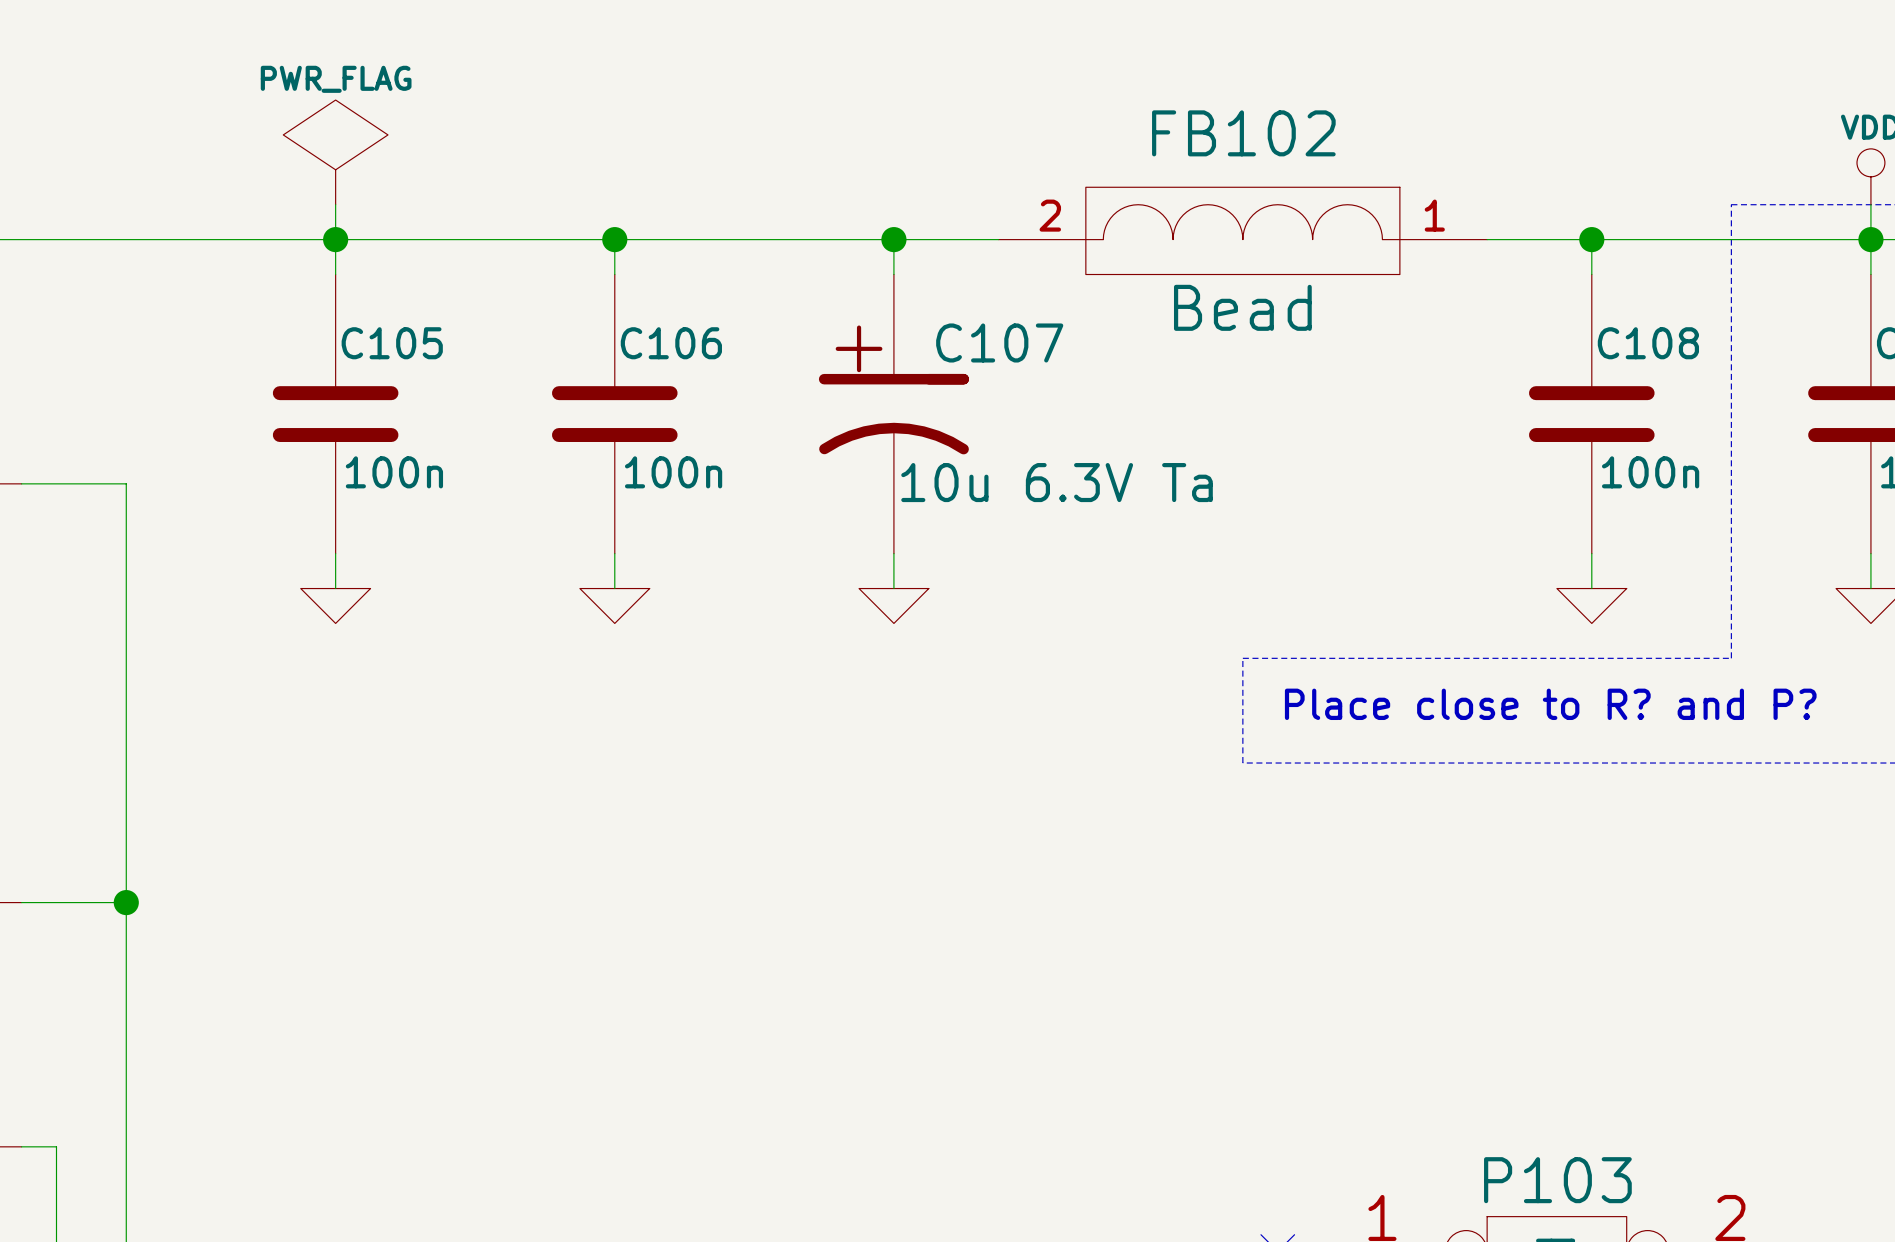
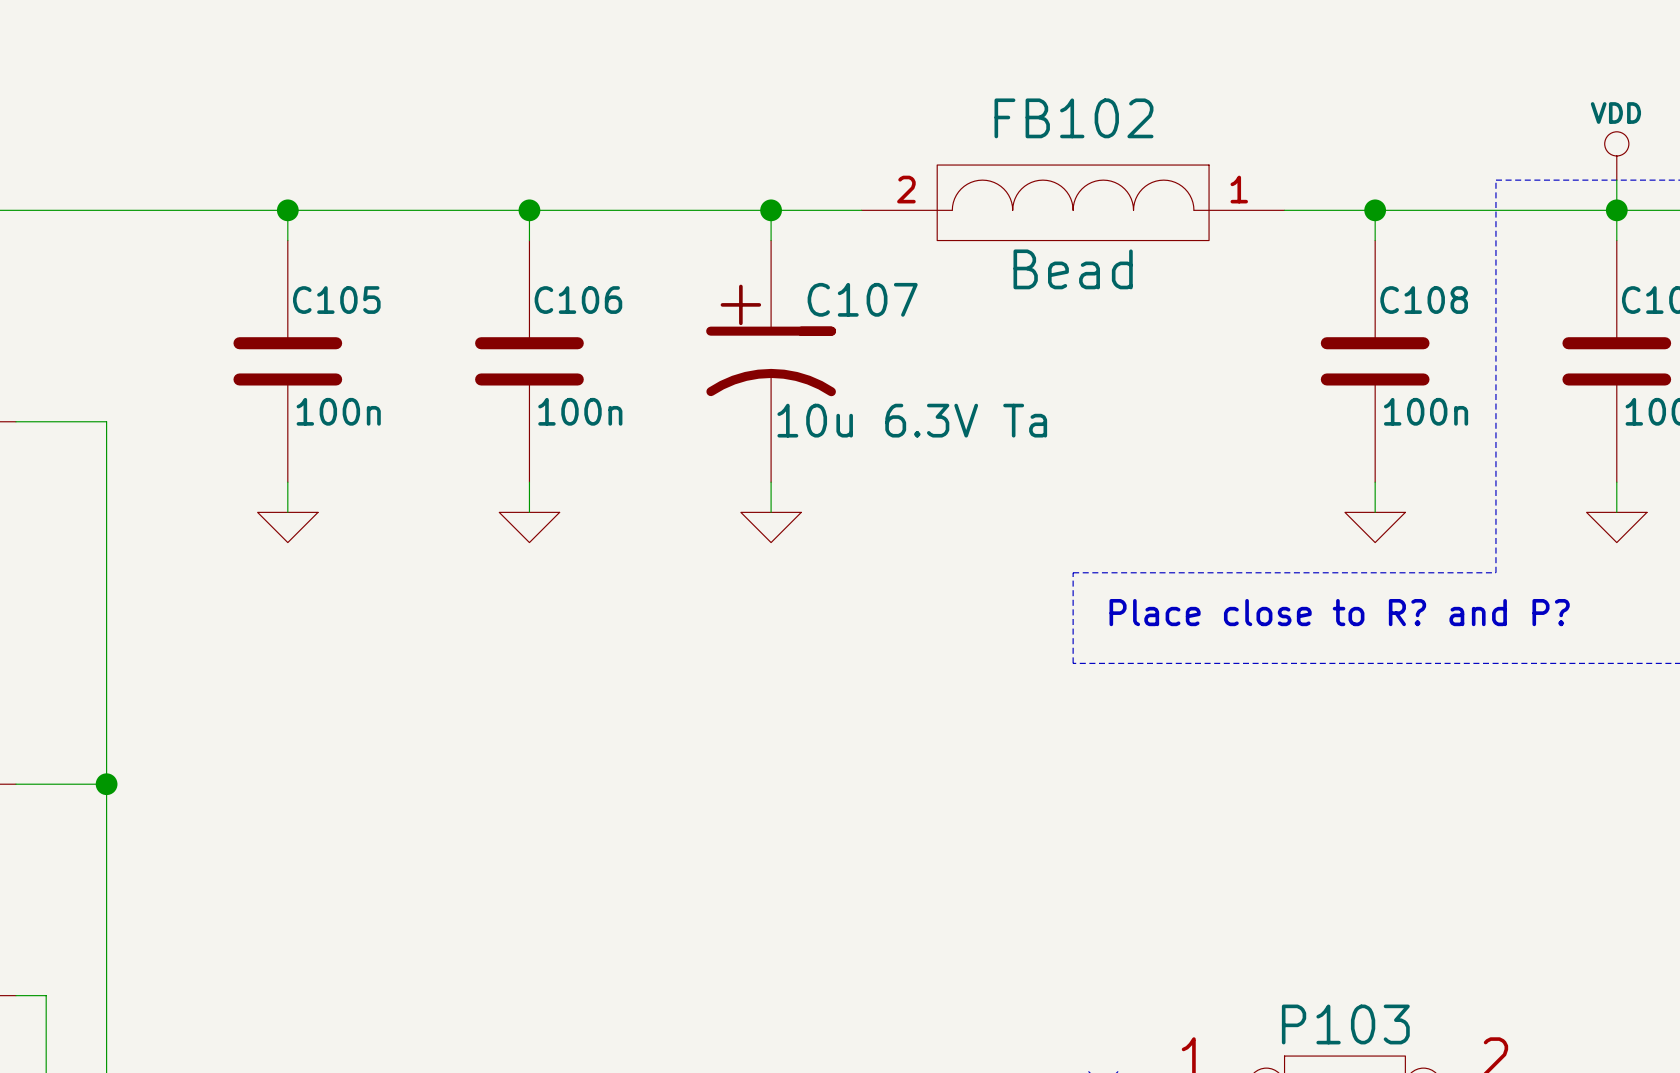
power symbol: PWR_FLAG (335, 152) -> none
wire: (335, 204) (335, 239) -> none

